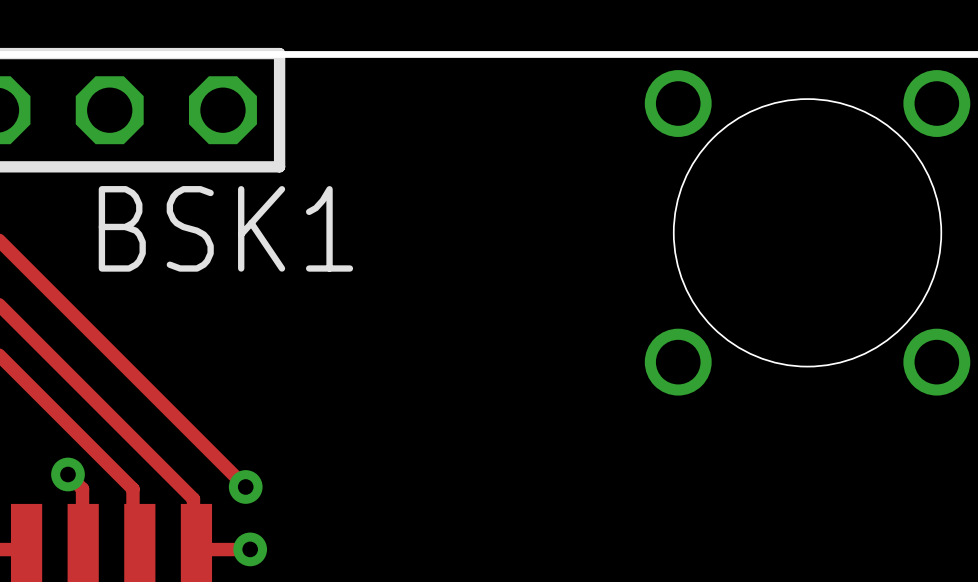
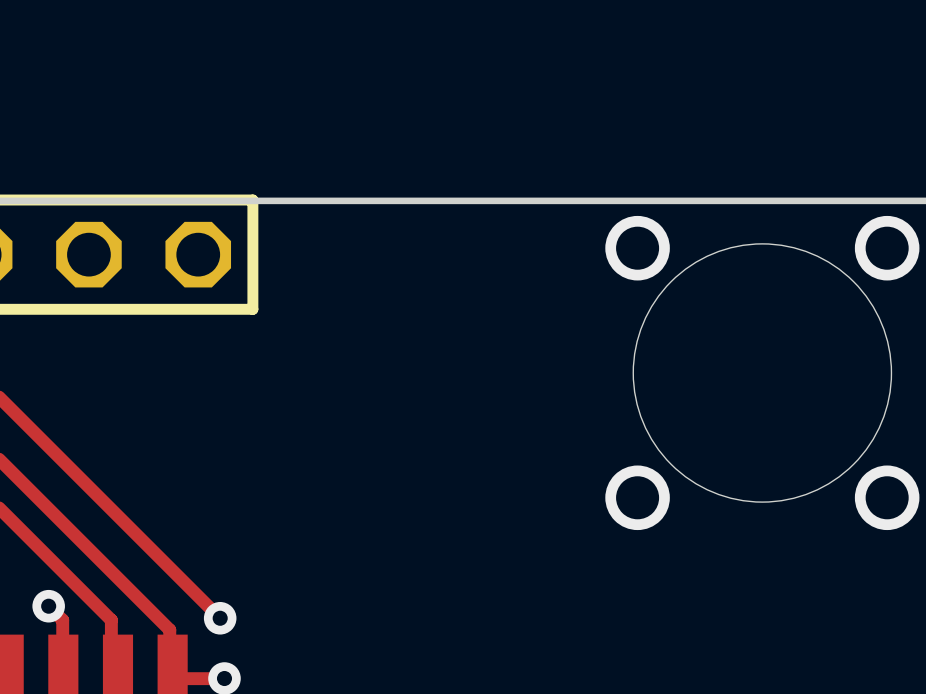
text: BSK1 (225, 228) -> none

